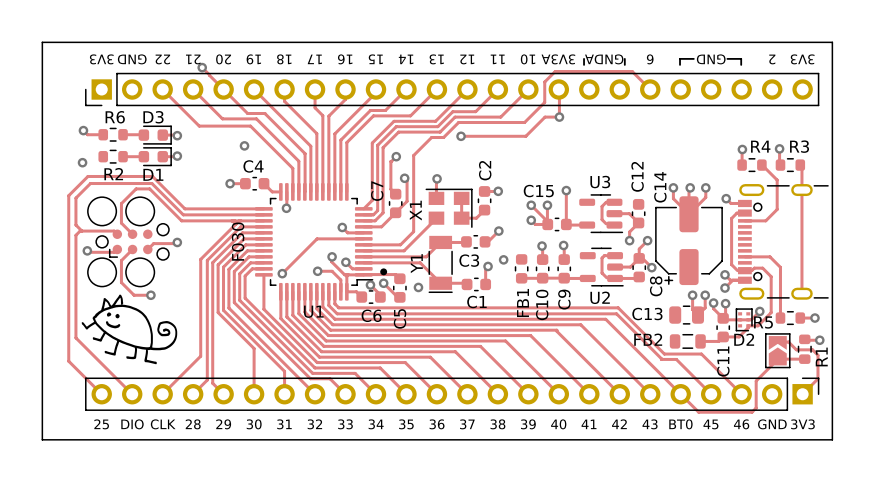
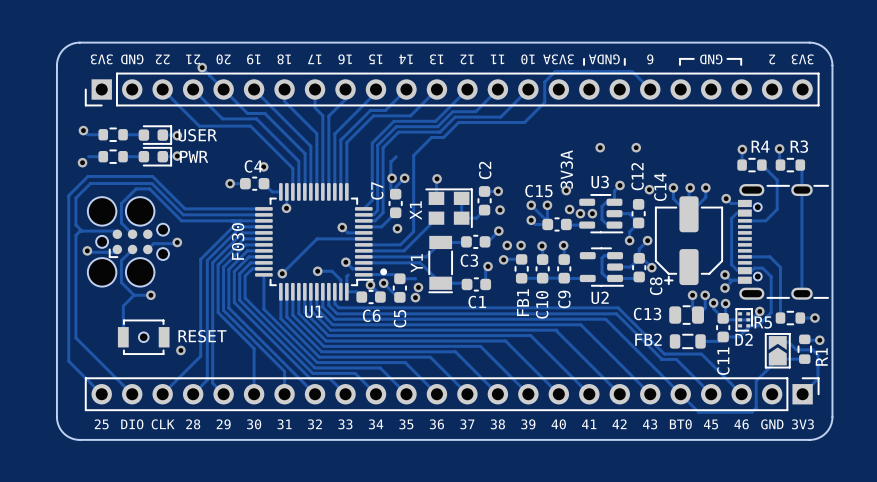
board edge: (42, 42) (832, 42) (832, 439) (42, 439) (42, 42) -> (79, 42) (72, 43) (63, 49) (59, 55) (56, 65) (56, 417) (60, 429) (69, 437) (79, 439) (809, 439) (821, 436) (829, 428) (832, 417) (832, 65) (829, 54) (821, 45) (809, 42) (79, 42)
track: (558, 89) (559, 117) (545, 117) (525, 136) (461, 136) -> none
R6 name: R6 (115, 117) -> none
D3 name: D3 (153, 117) -> none
via: (559, 117) -> none
text: none -> USER (197, 135)
via: (461, 136) -> none
via position: (244, 145) -> (263, 166)
via: none -> (600, 147)
via: none -> (636, 147)
track: none -> (88, 156) (103, 156)
text: none -> PWR (194, 156)
via position: (396, 156) -> (392, 178)
text: none -> 3V3A (566, 169)
R2 name: R2 (113, 174) -> none
D1 name: D1 (153, 174) -> none
track: (404, 178) (407, 180) (407, 201) (395, 212) -> (404, 178) (395, 187)
track: none -> (620, 185) (614, 191) (614, 202)
via: none -> (620, 185)
via: none -> (649, 189)
track: (566, 190) (566, 224) -> none
via: none -> (569, 209)
via: none -> (500, 210)
via: none -> (580, 213)
via: none -> (592, 213)
via: none -> (397, 228)
via: none -> (507, 245)
via: none -> (521, 245)
track: (332, 256) (331, 261) (344, 274) (363, 274) -> none
via: (332, 256) -> none
track: none -> (506, 259) (521, 259)
track: none -> (399, 278) (415, 279)
drawing: [81, 294, 178, 365] -> none
track: none -> (134, 295) (123, 306) (123, 337)
via: none -> (415, 297)
text: none -> RESET (202, 336)
part: none -> (143, 337)
via: none -> (180, 350)

